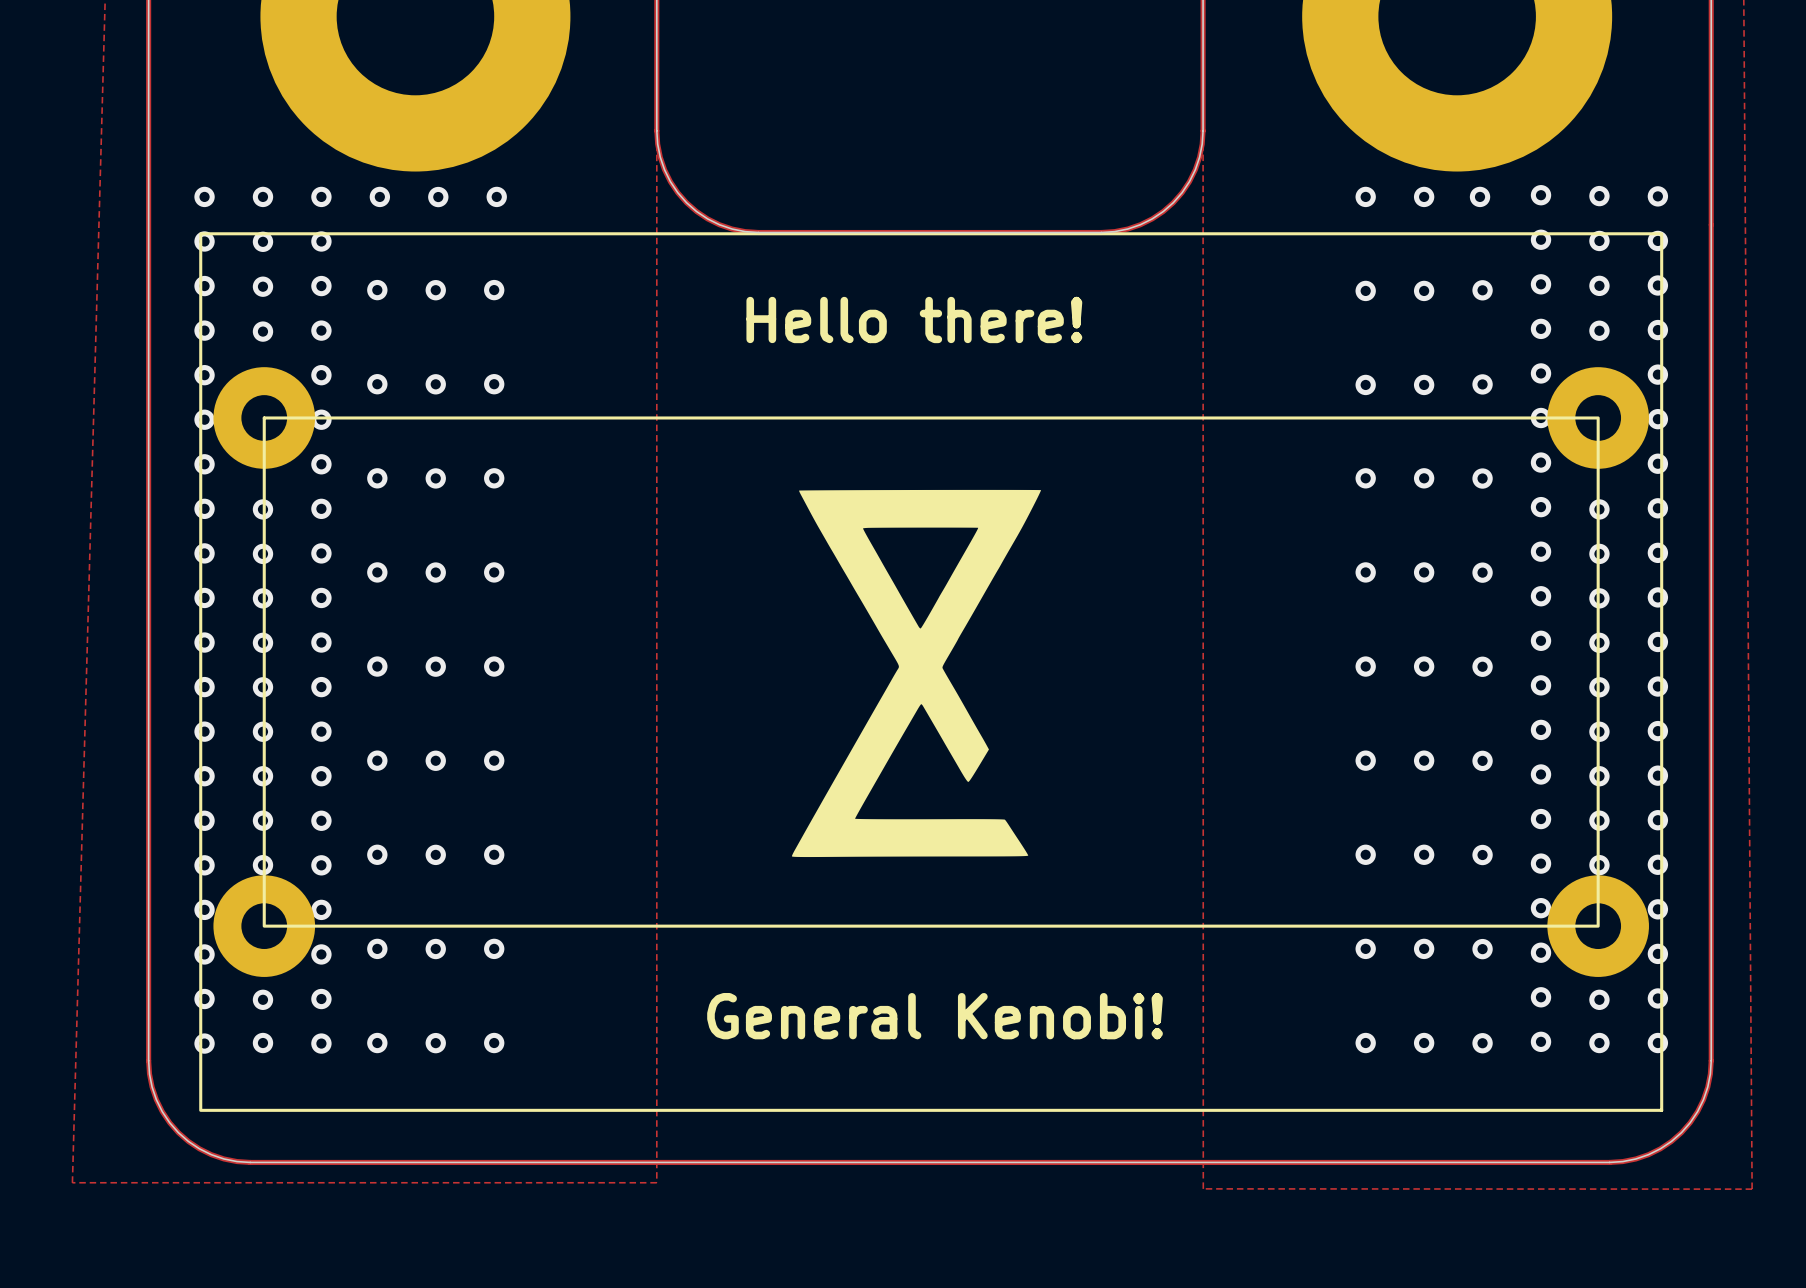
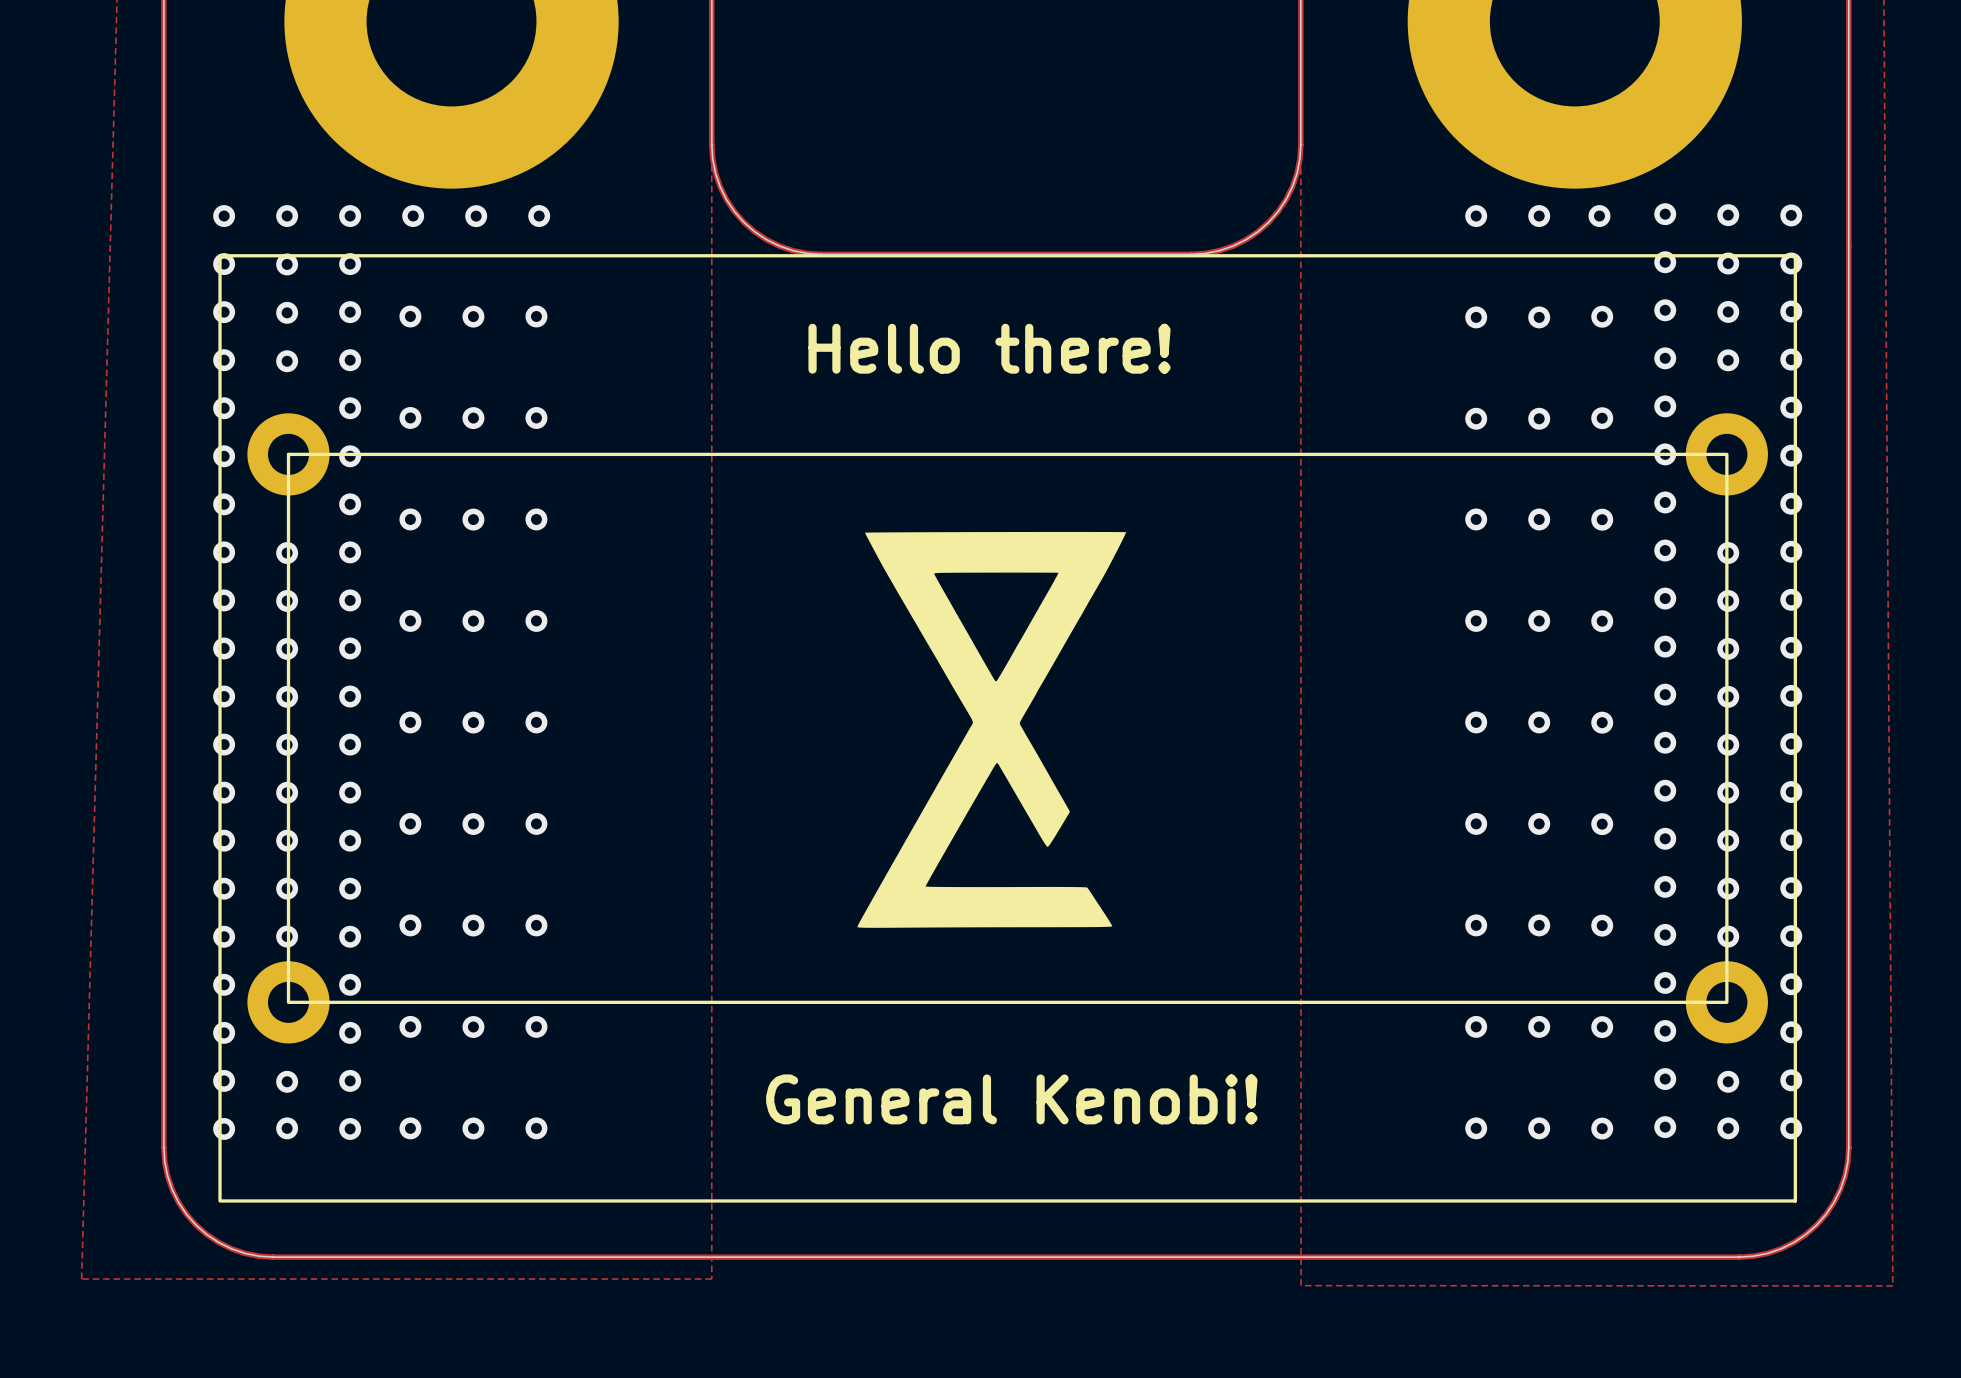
part footprint: [199, 232, 1664, 1112] -> [218, 254, 1798, 1203]

